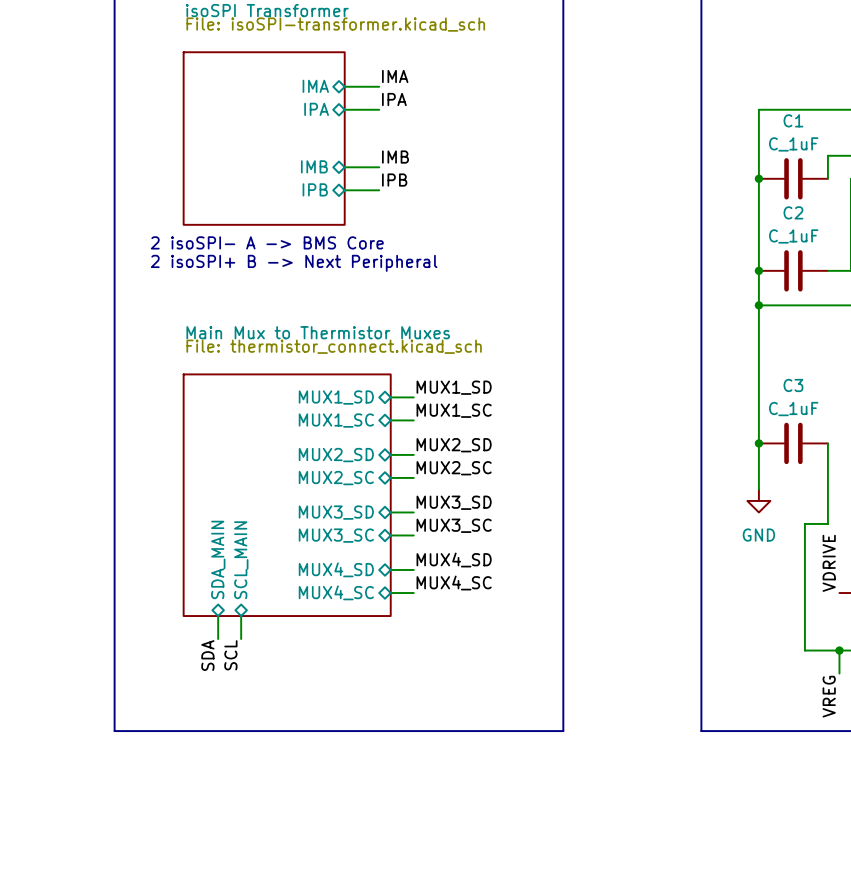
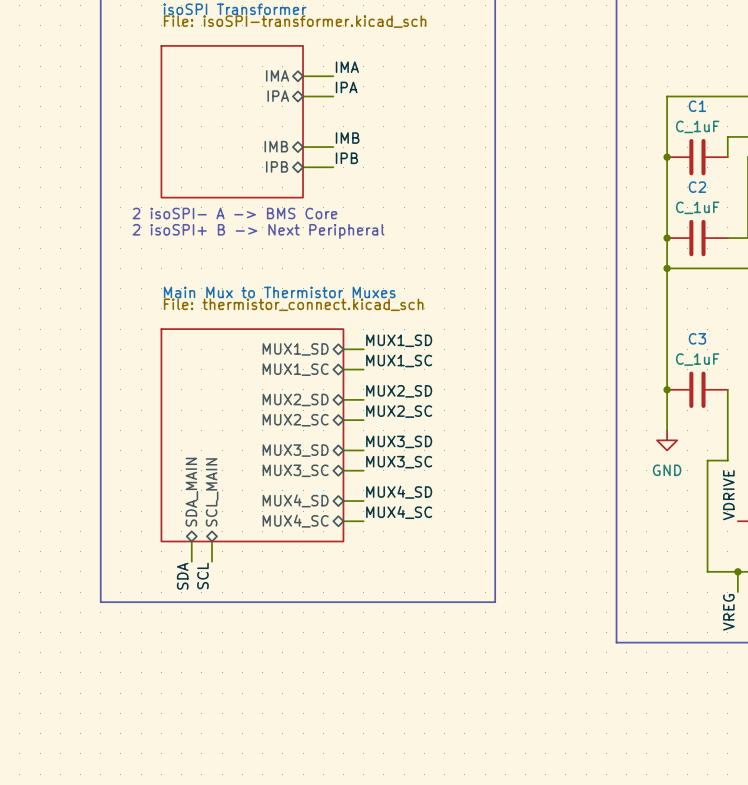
line: (114, 685) (114, 731) (563, 731) (563, 685) -> (100, 602) (495, 602)

